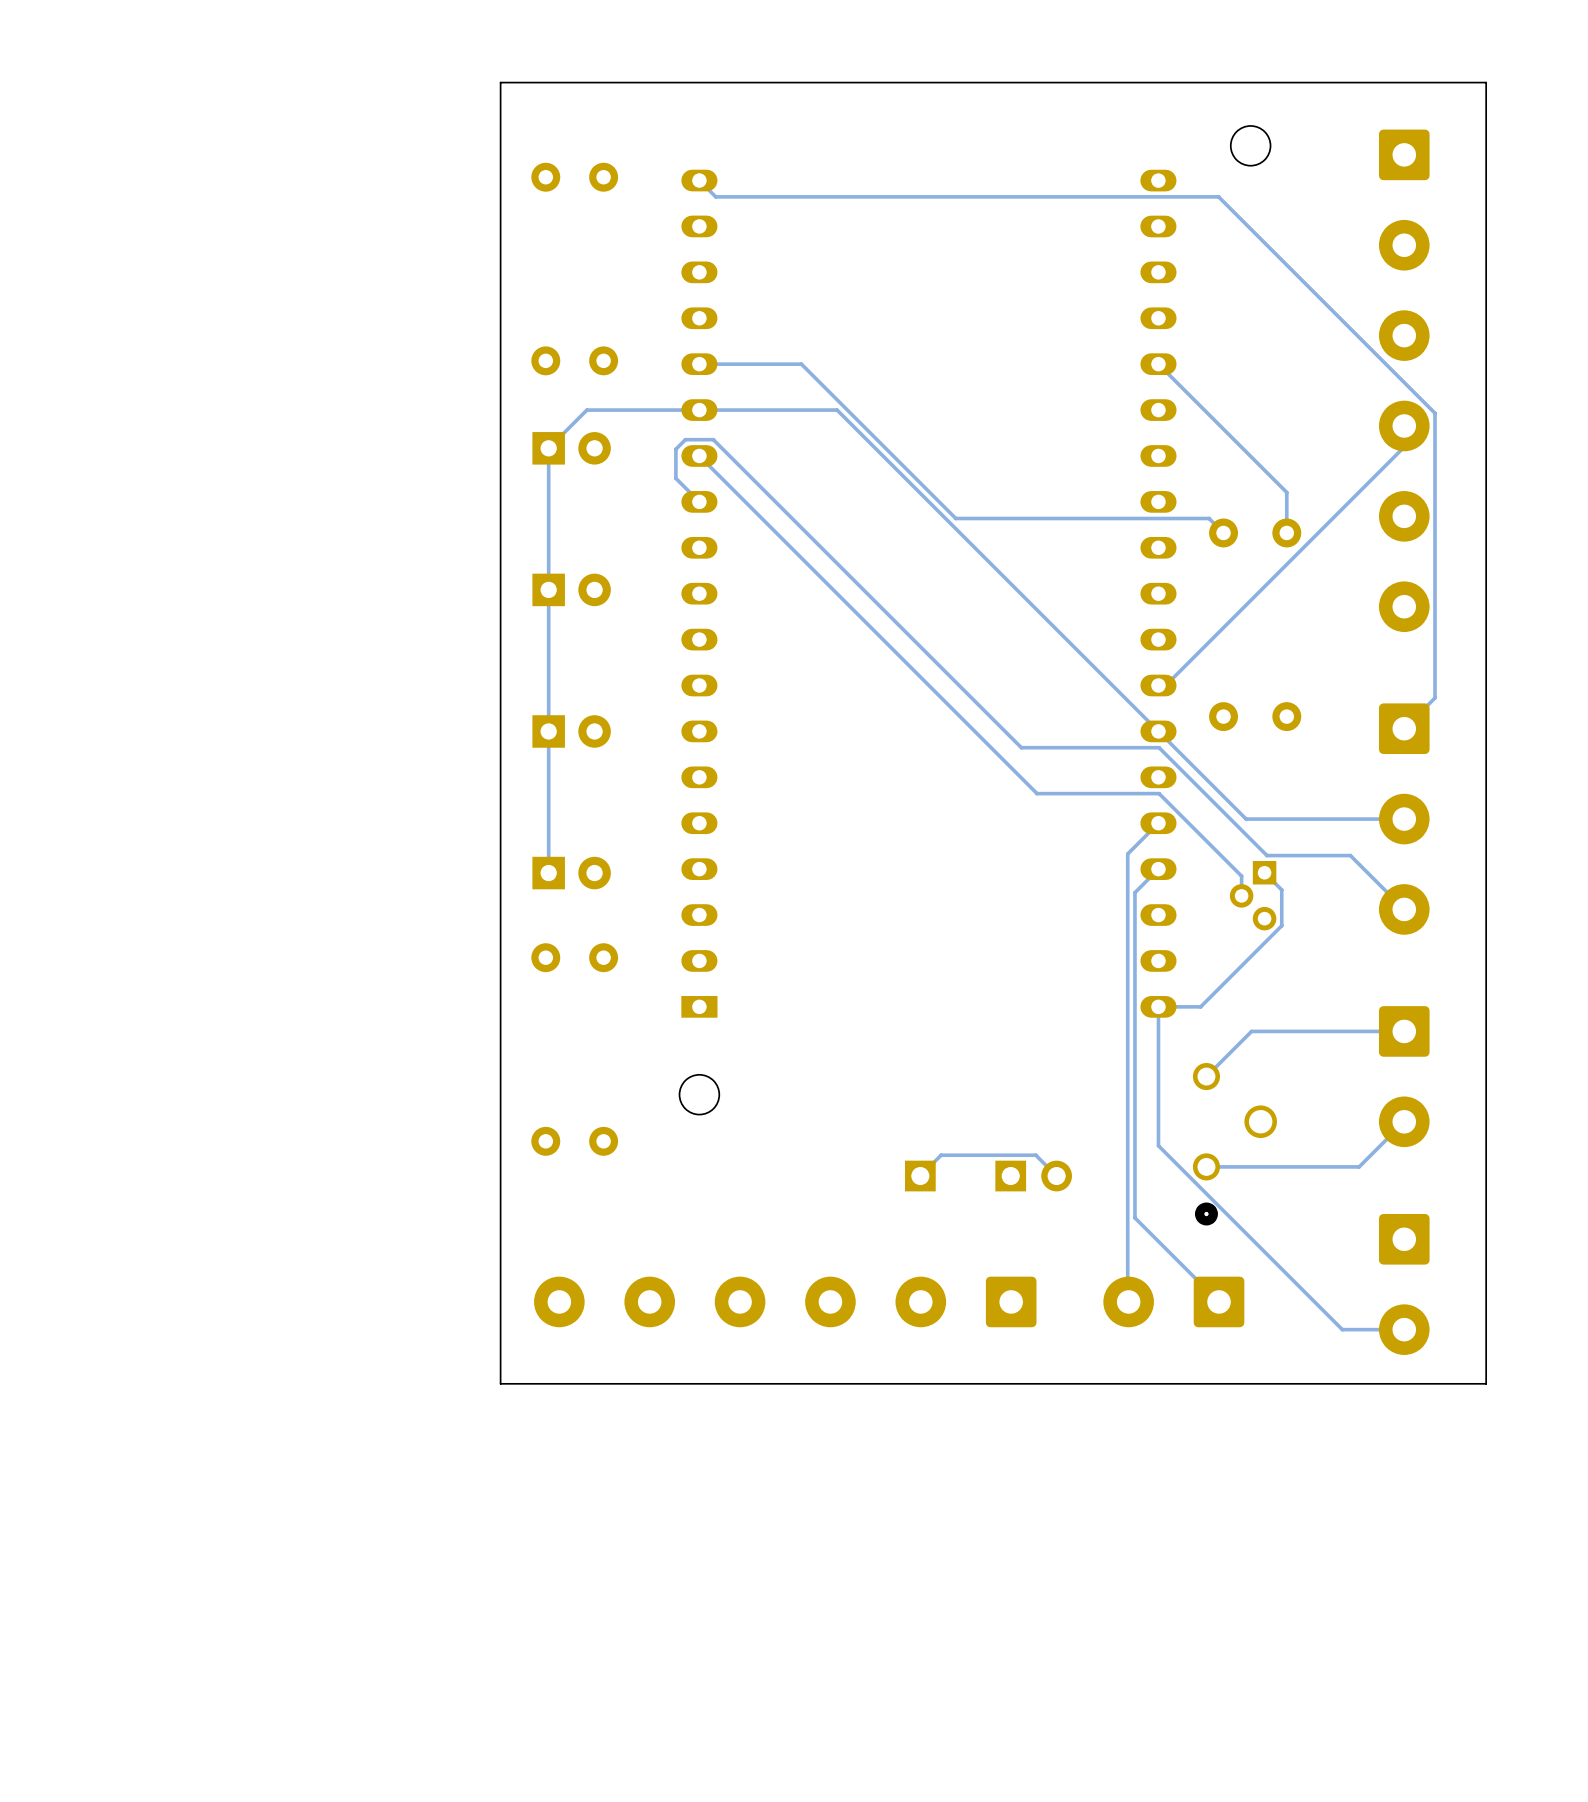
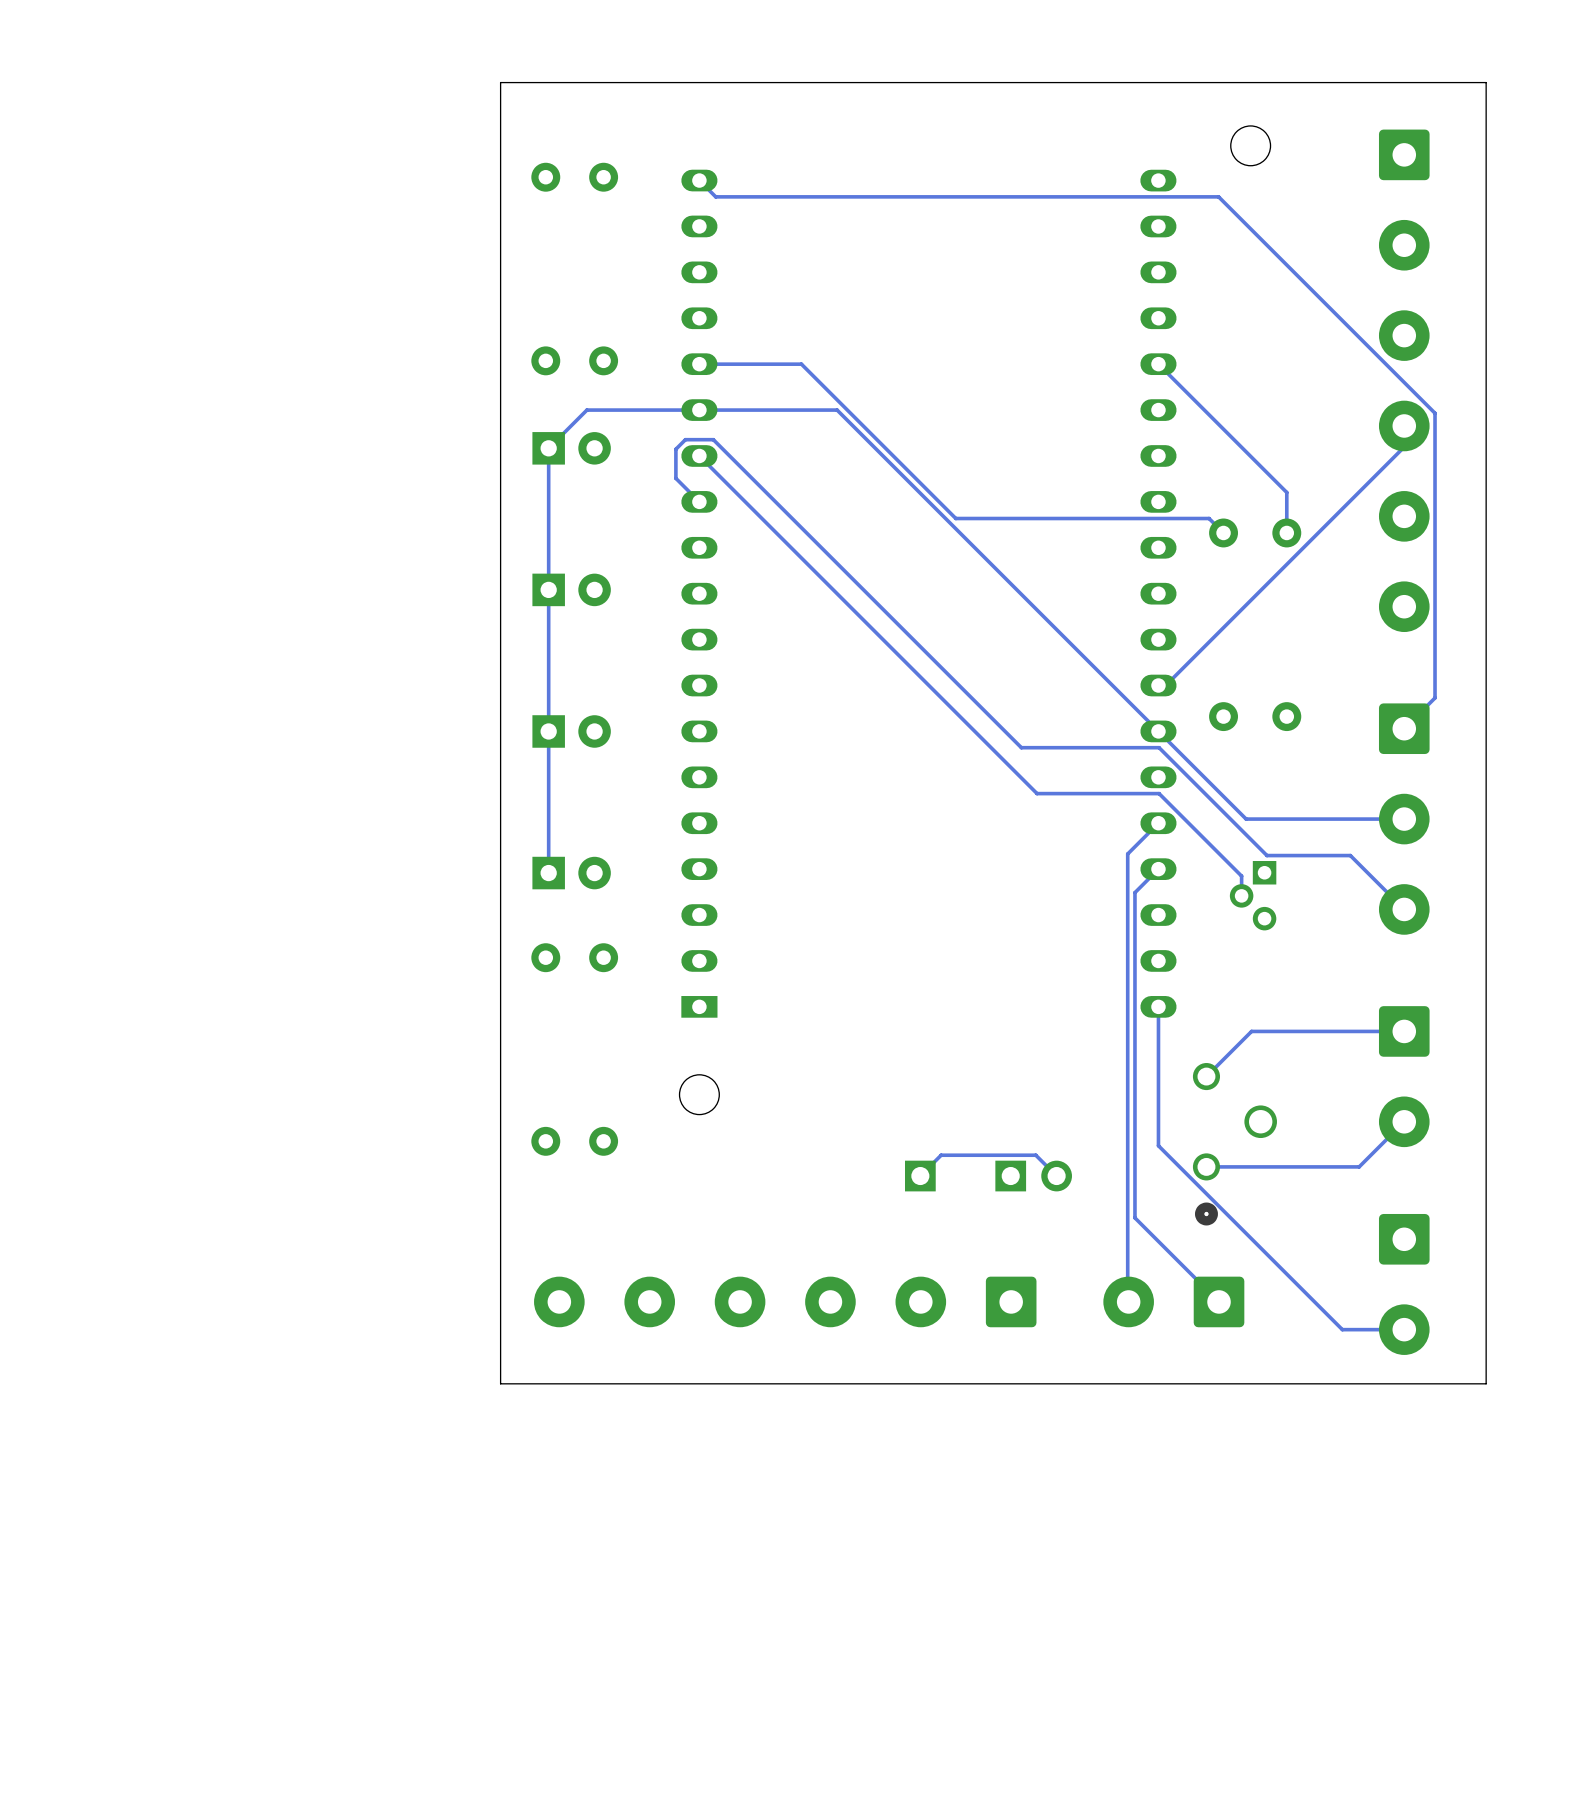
track: (1264, 872) (1281, 889) (1281, 925) (1200, 1006) (1158, 1006) -> none

